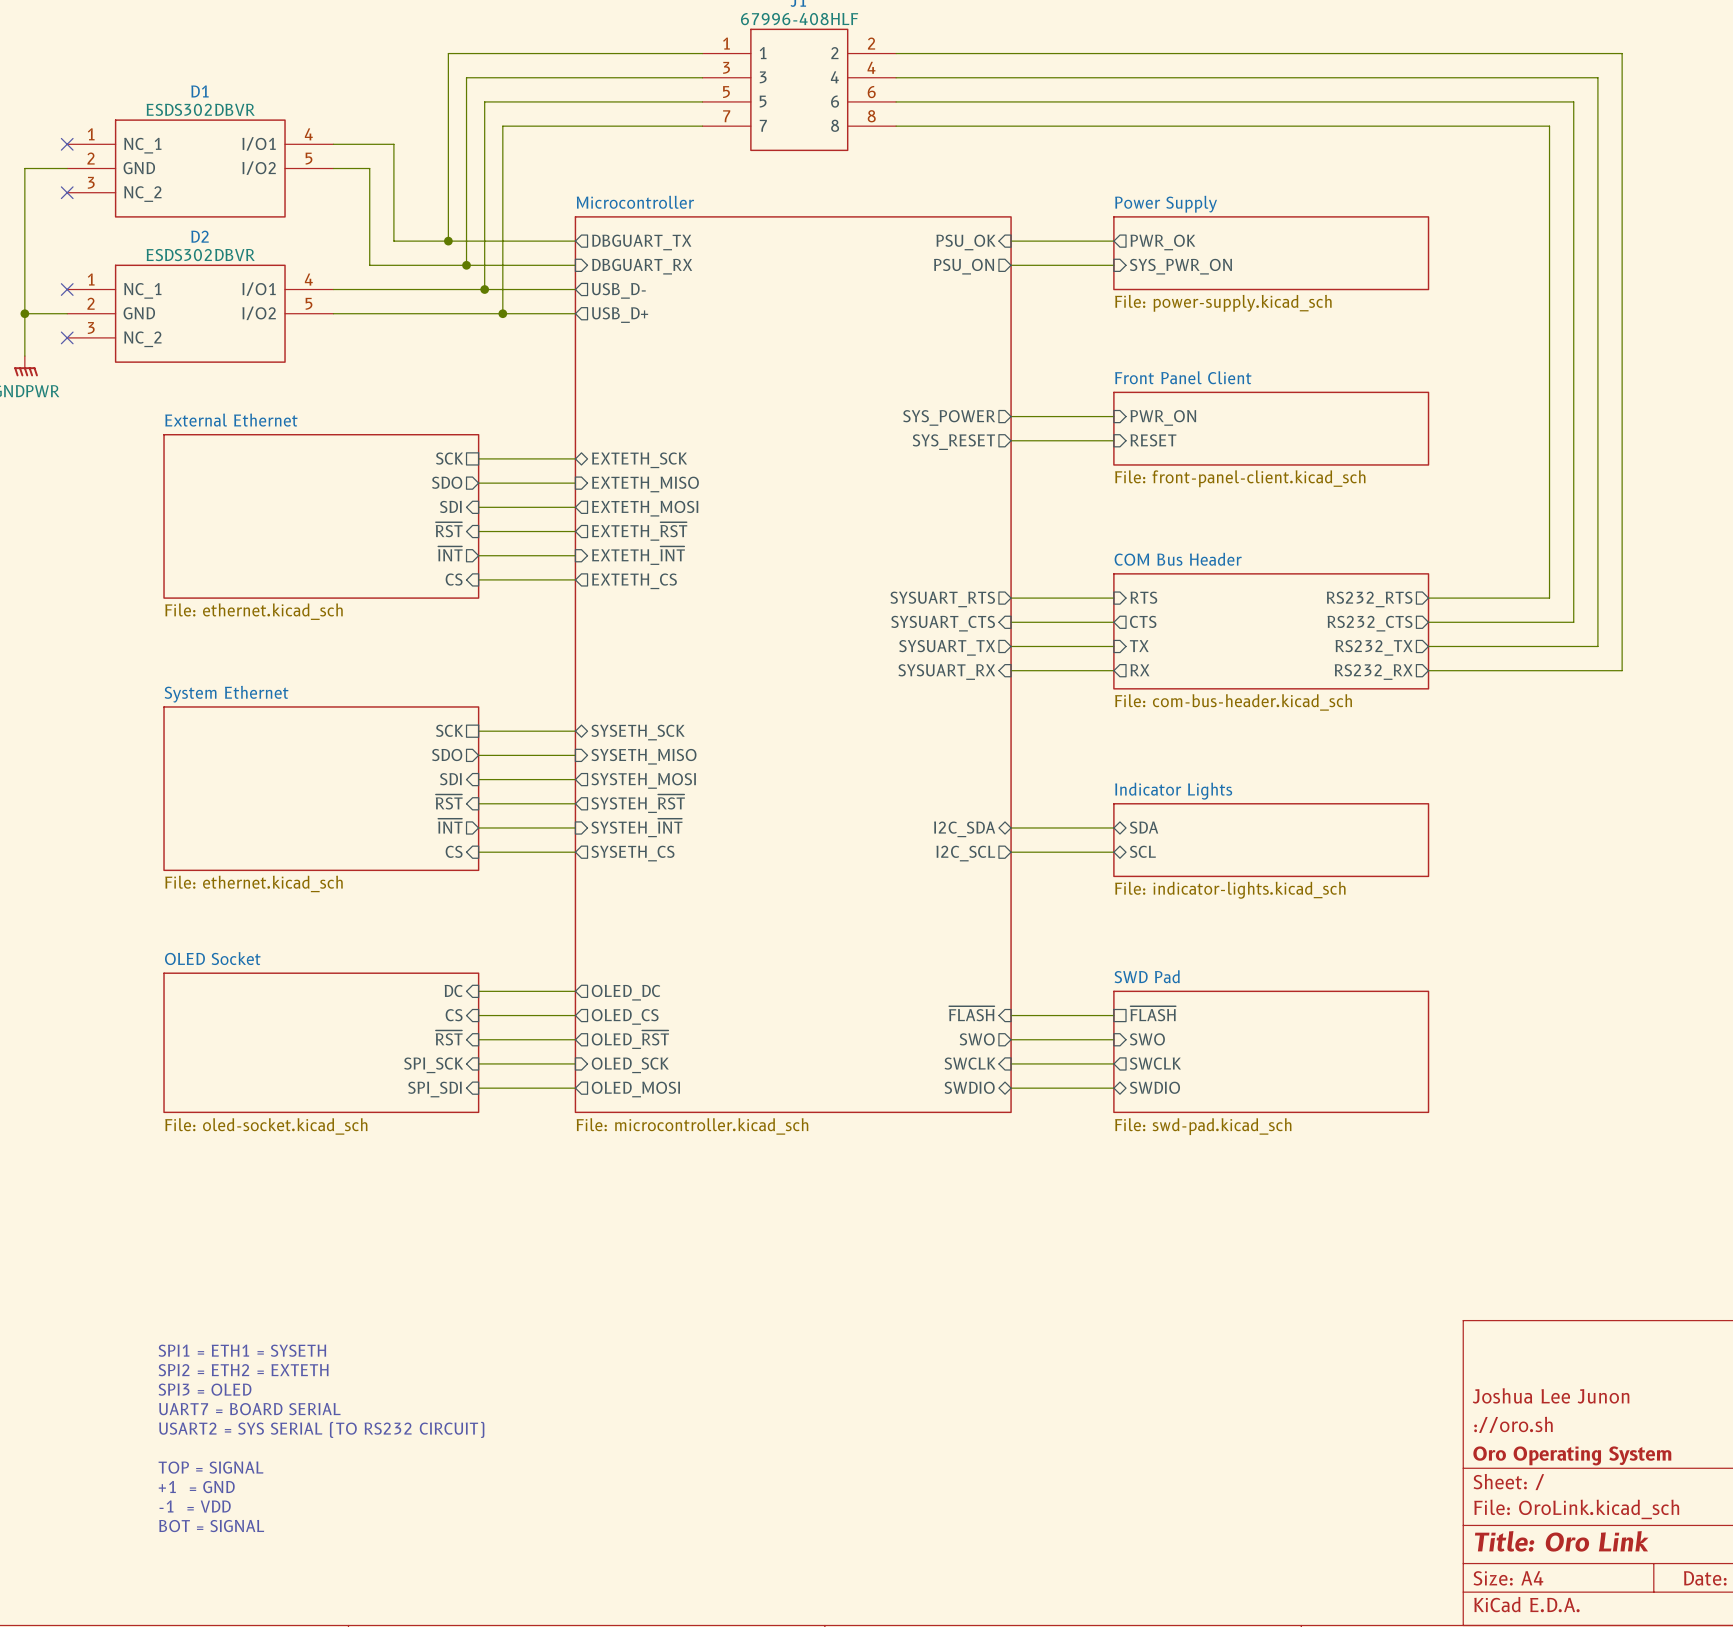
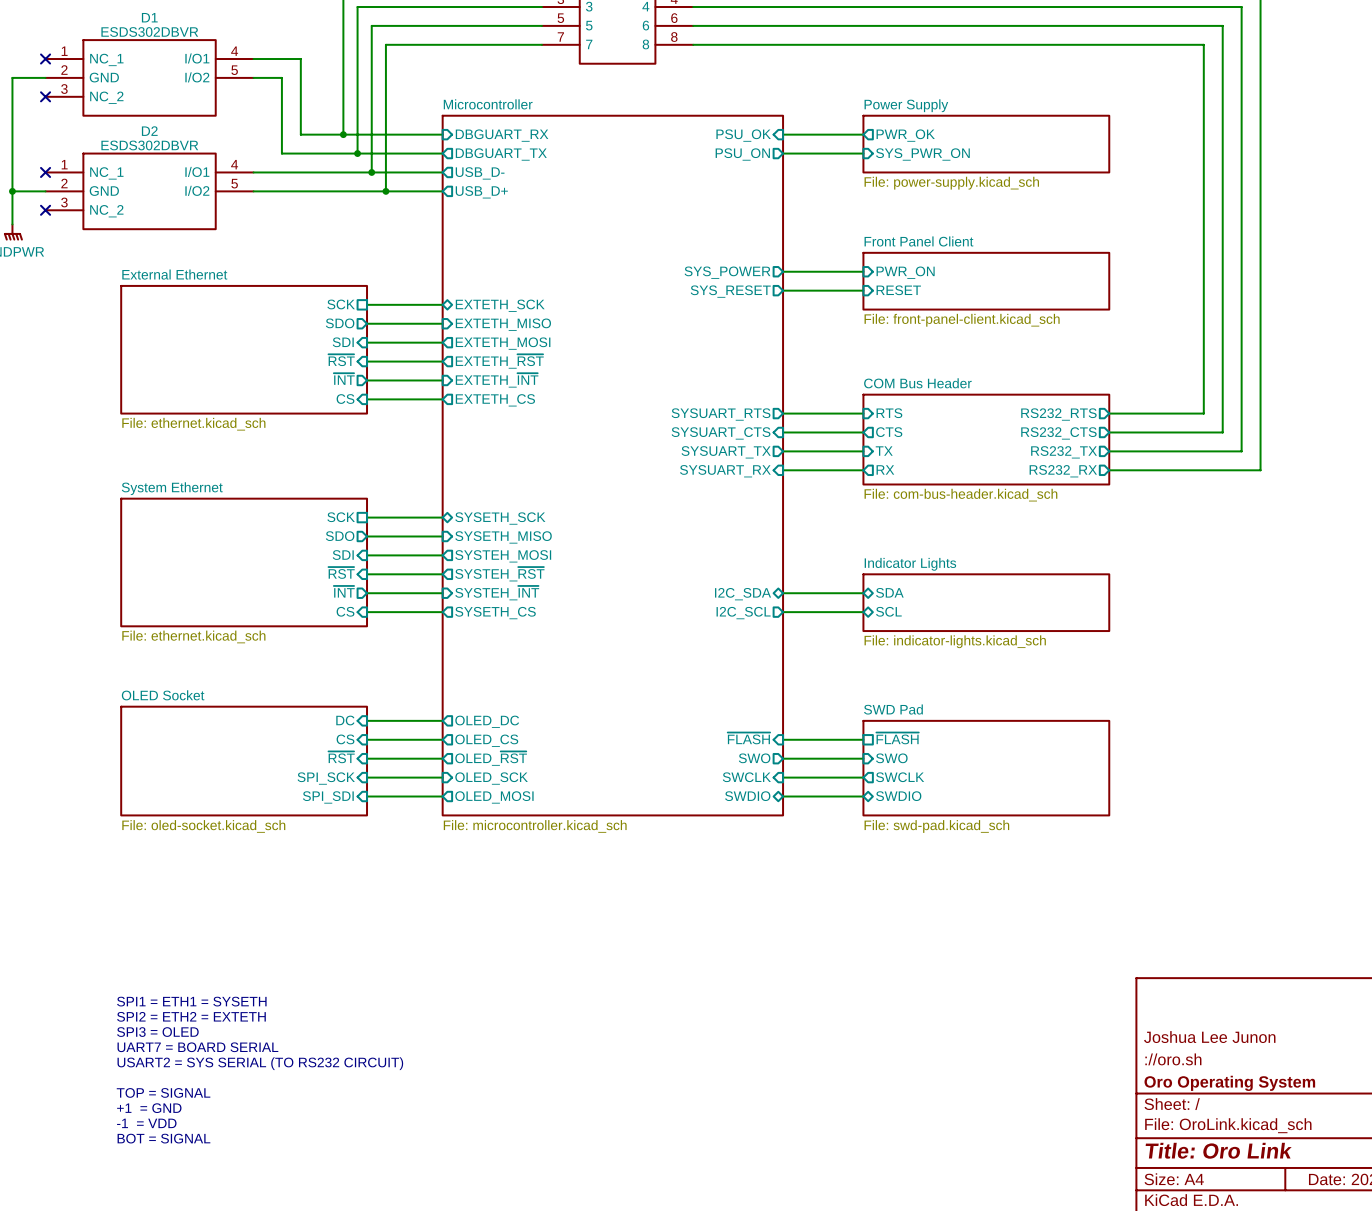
sheet pin shape: output (641, 242) -> input (502, 135)
sheet pin: DBGUART_TX (641, 242) -> DBGUART_RX (502, 135)
sheet pin shape: input (642, 266) -> output (501, 154)
sheet pin: DBGUART_RX (642, 266) -> DBGUART_TX (501, 154)

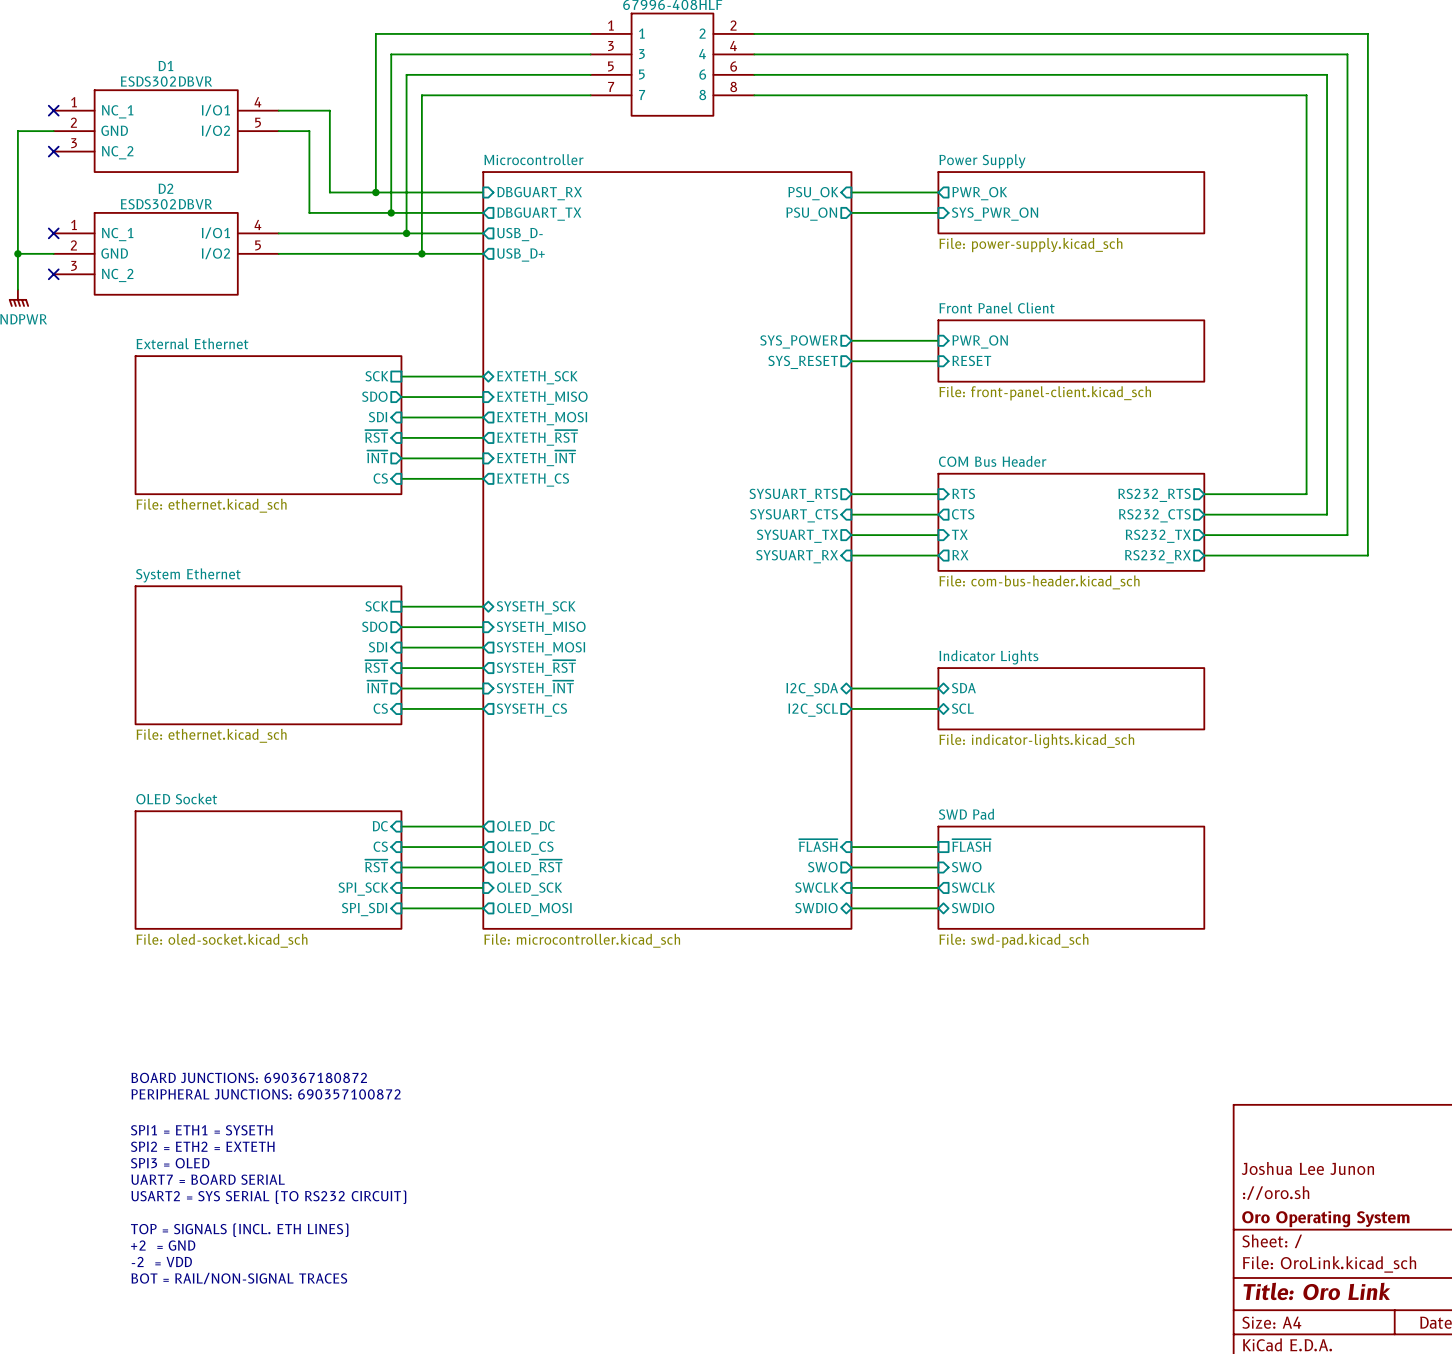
text: none -> BOARD JUNCTIONS: 690367180872 (249, 1077)
text: none -> PERIPHERAL JUNCTIONS: 690357100872 (266, 1094)
text: TOP = SIGNAL (163, 1092) -> TOP = SIGNALS (INCL. ETH LINES) (239, 1230)
text: +1 = GND (149, 1108) -> +2 = GND (163, 1245)
text: -1 = VDD (146, 1123) -> -2 = VDD (161, 1262)
text: BOT = SIGNAL (163, 1138) -> BOT = RAIL/NON-SIGNAL TRACES (239, 1278)

